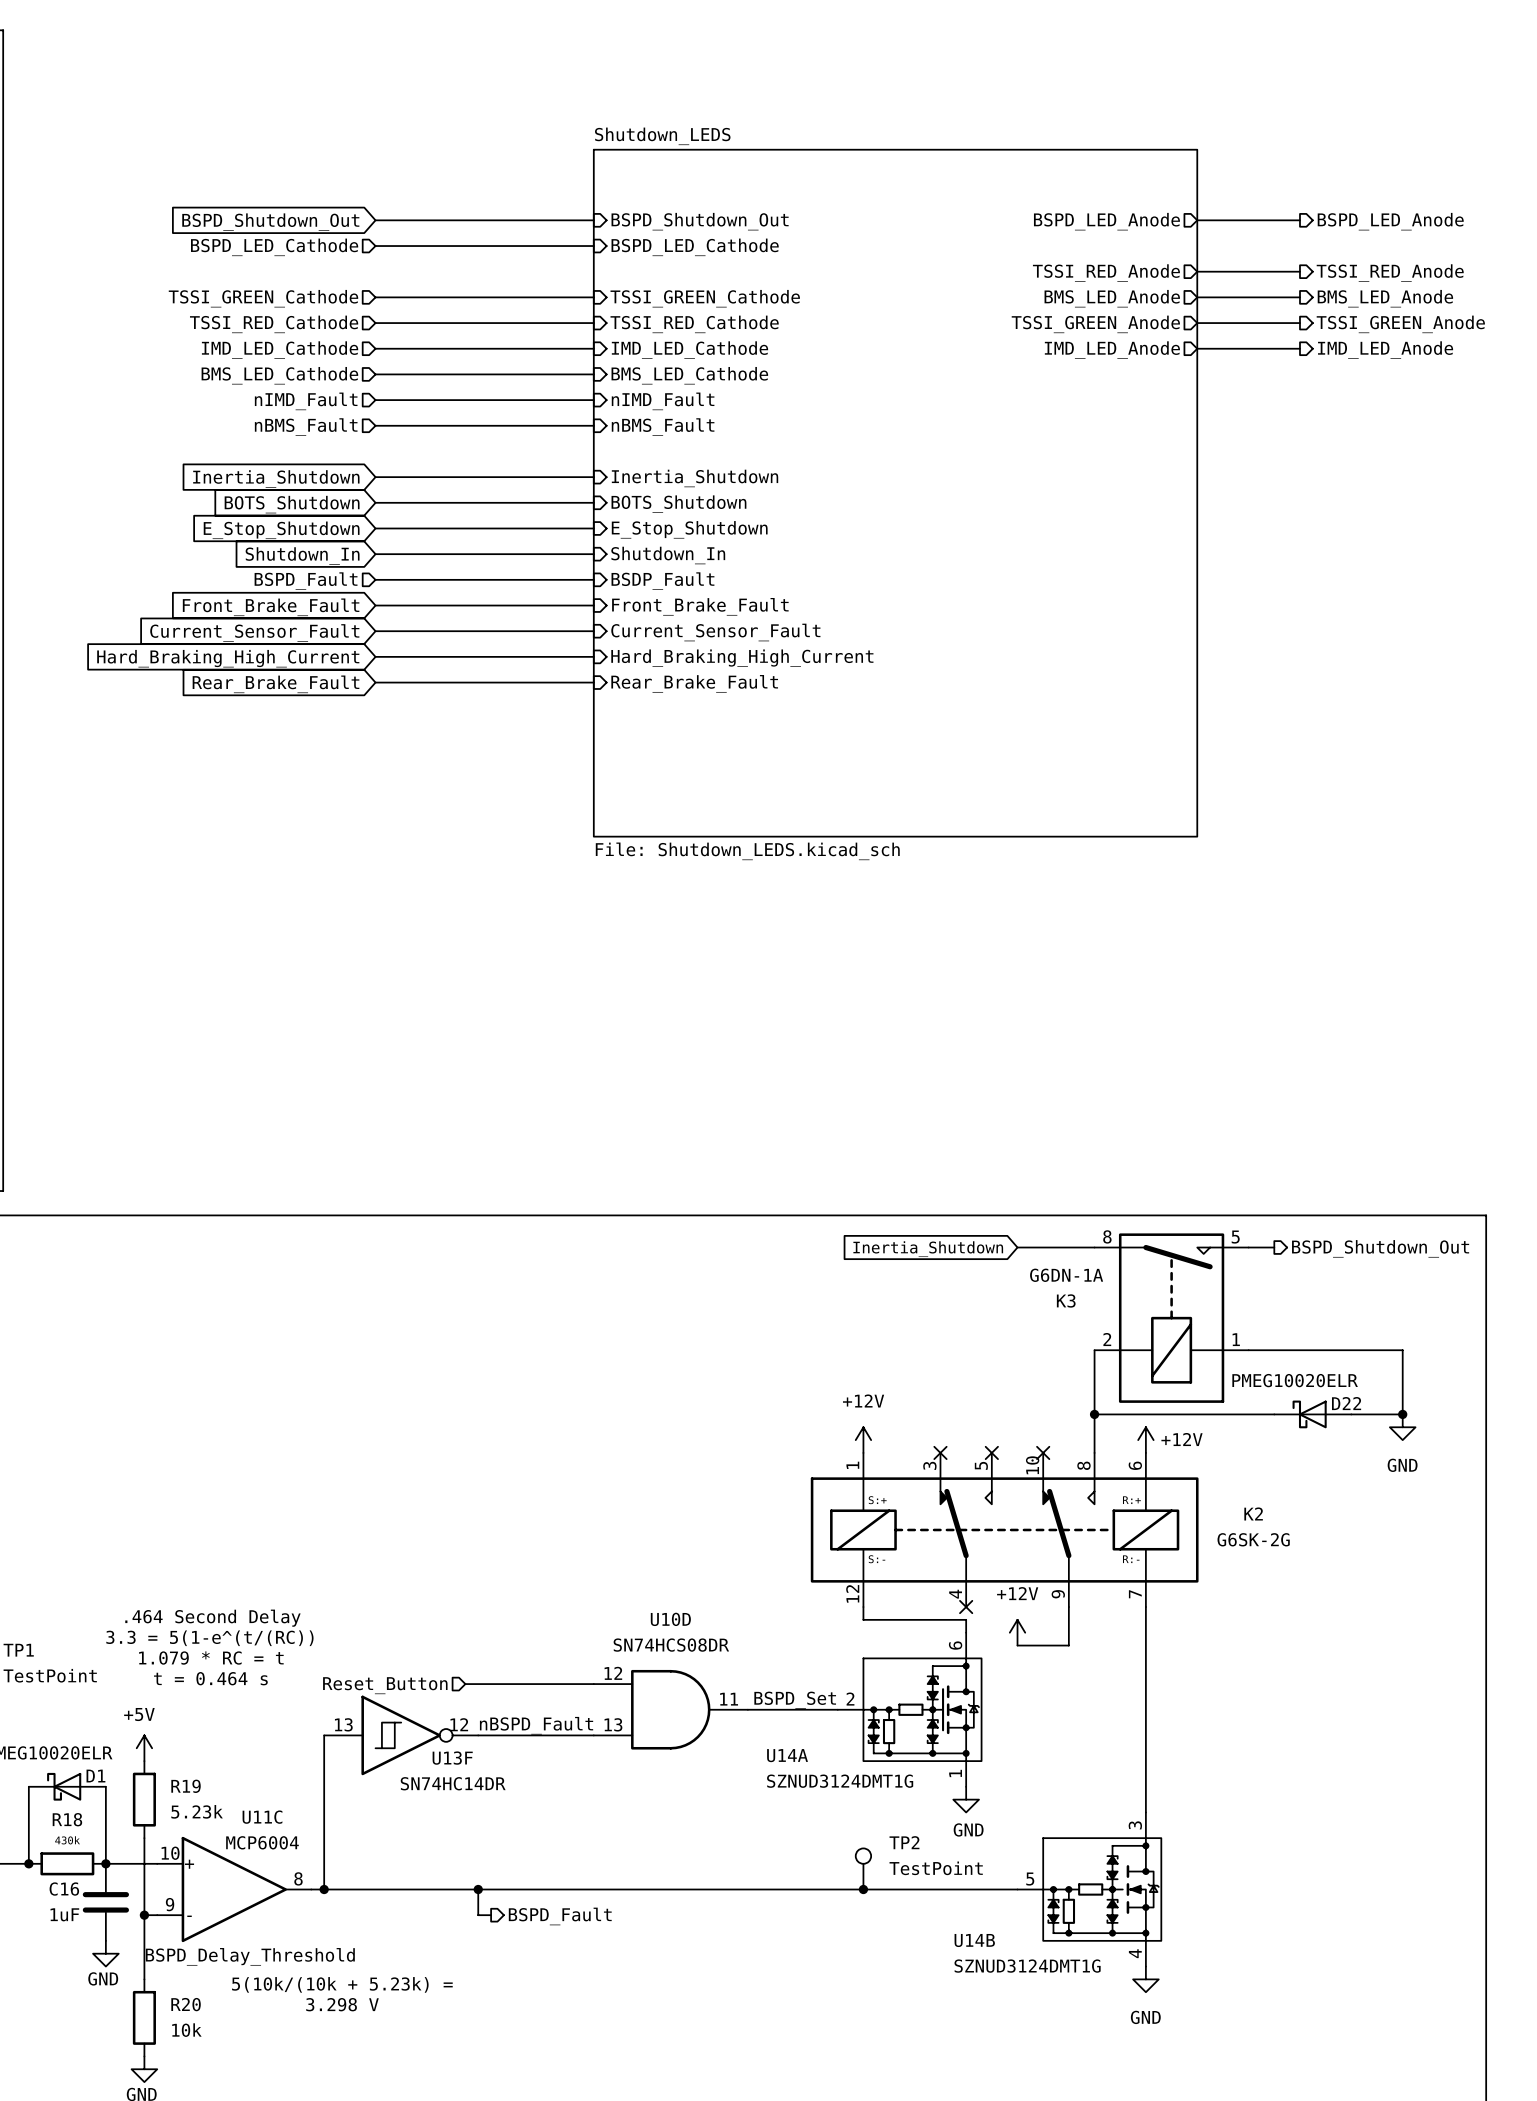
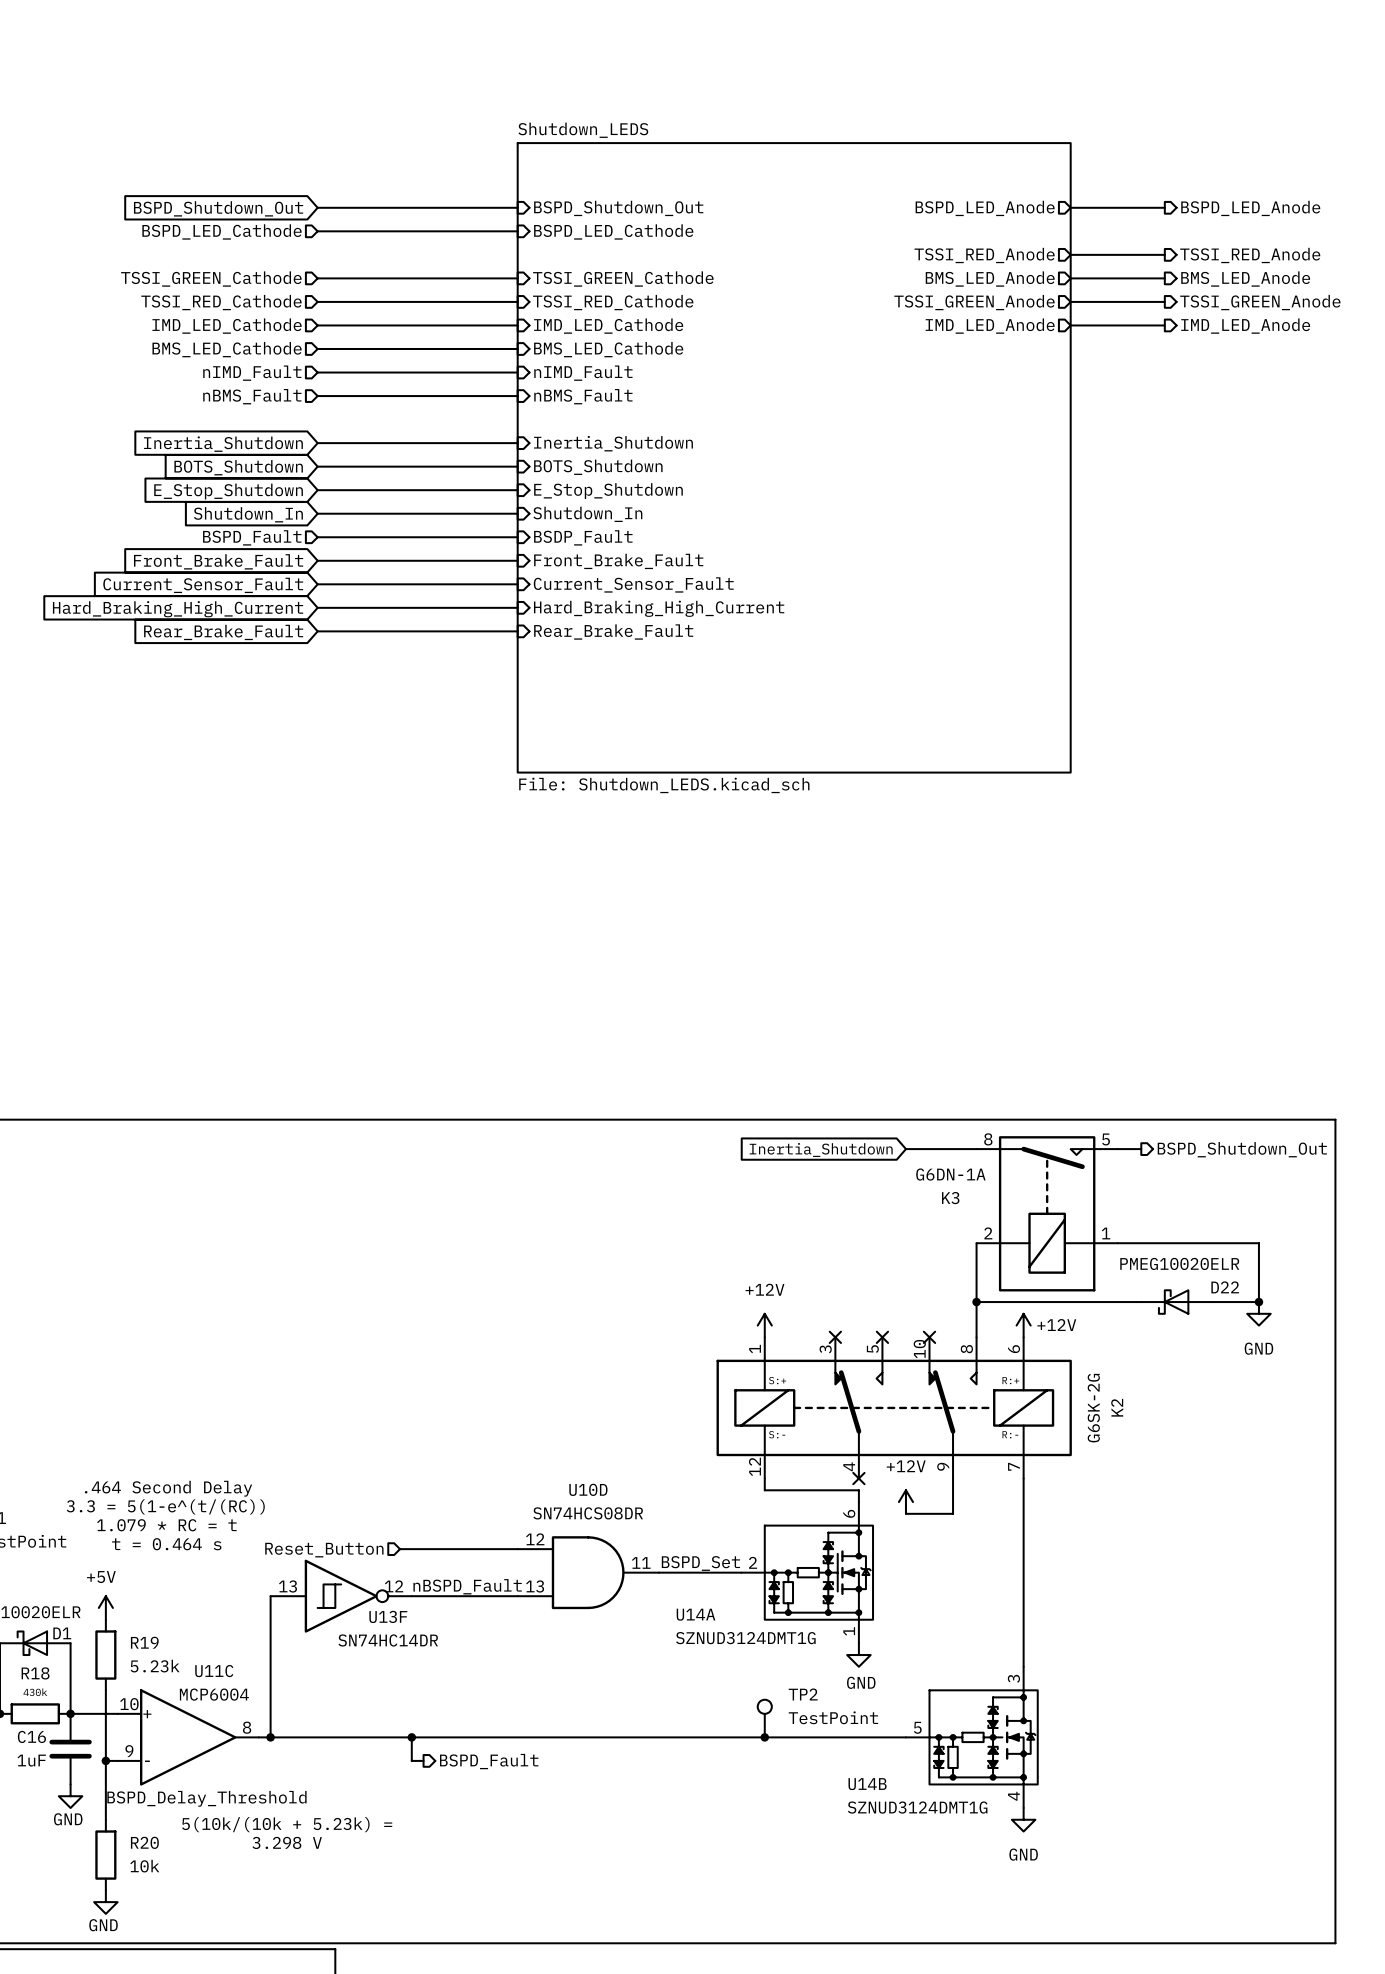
D22 flip: as is (1309, 1414) -> up-down (1173, 1302)
K2 name rotation: 0° (1253, 1513) -> 90° counterclockwise (1117, 1407)
K2 value rotation: 0° (1253, 1539) -> 90° counterclockwise (1093, 1408)

